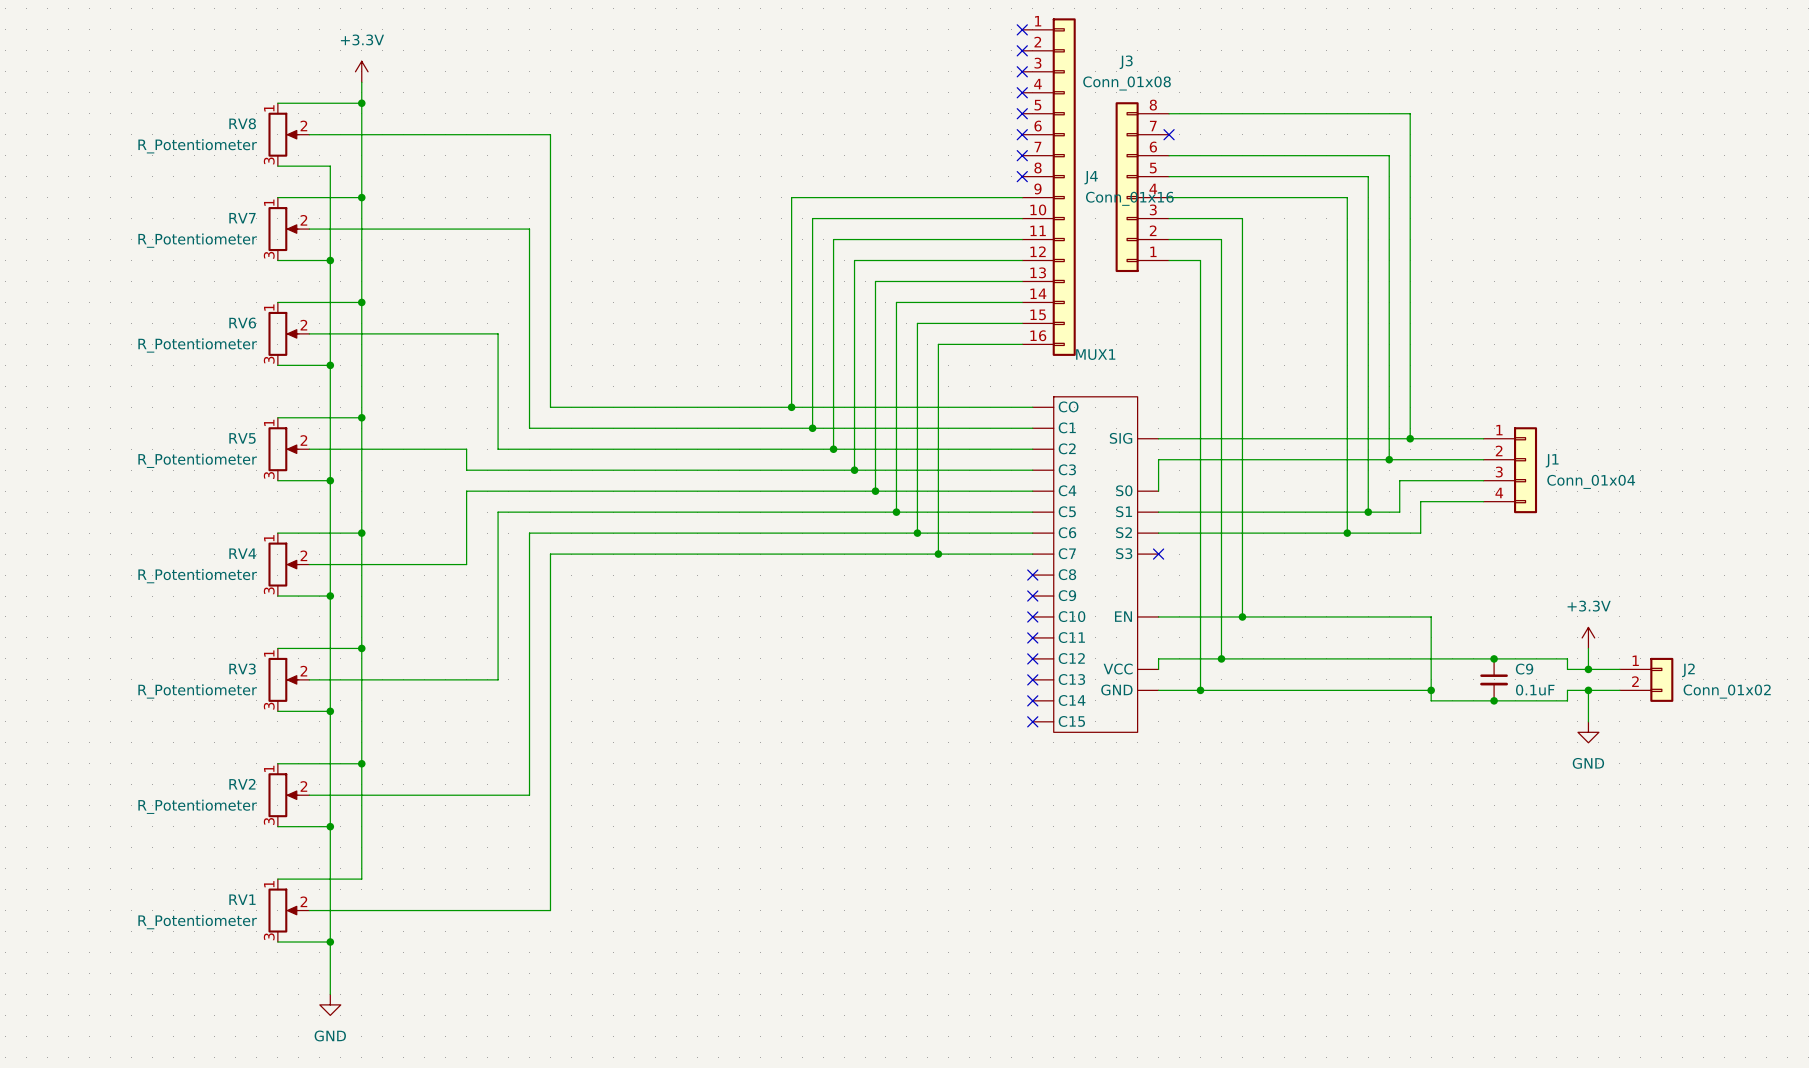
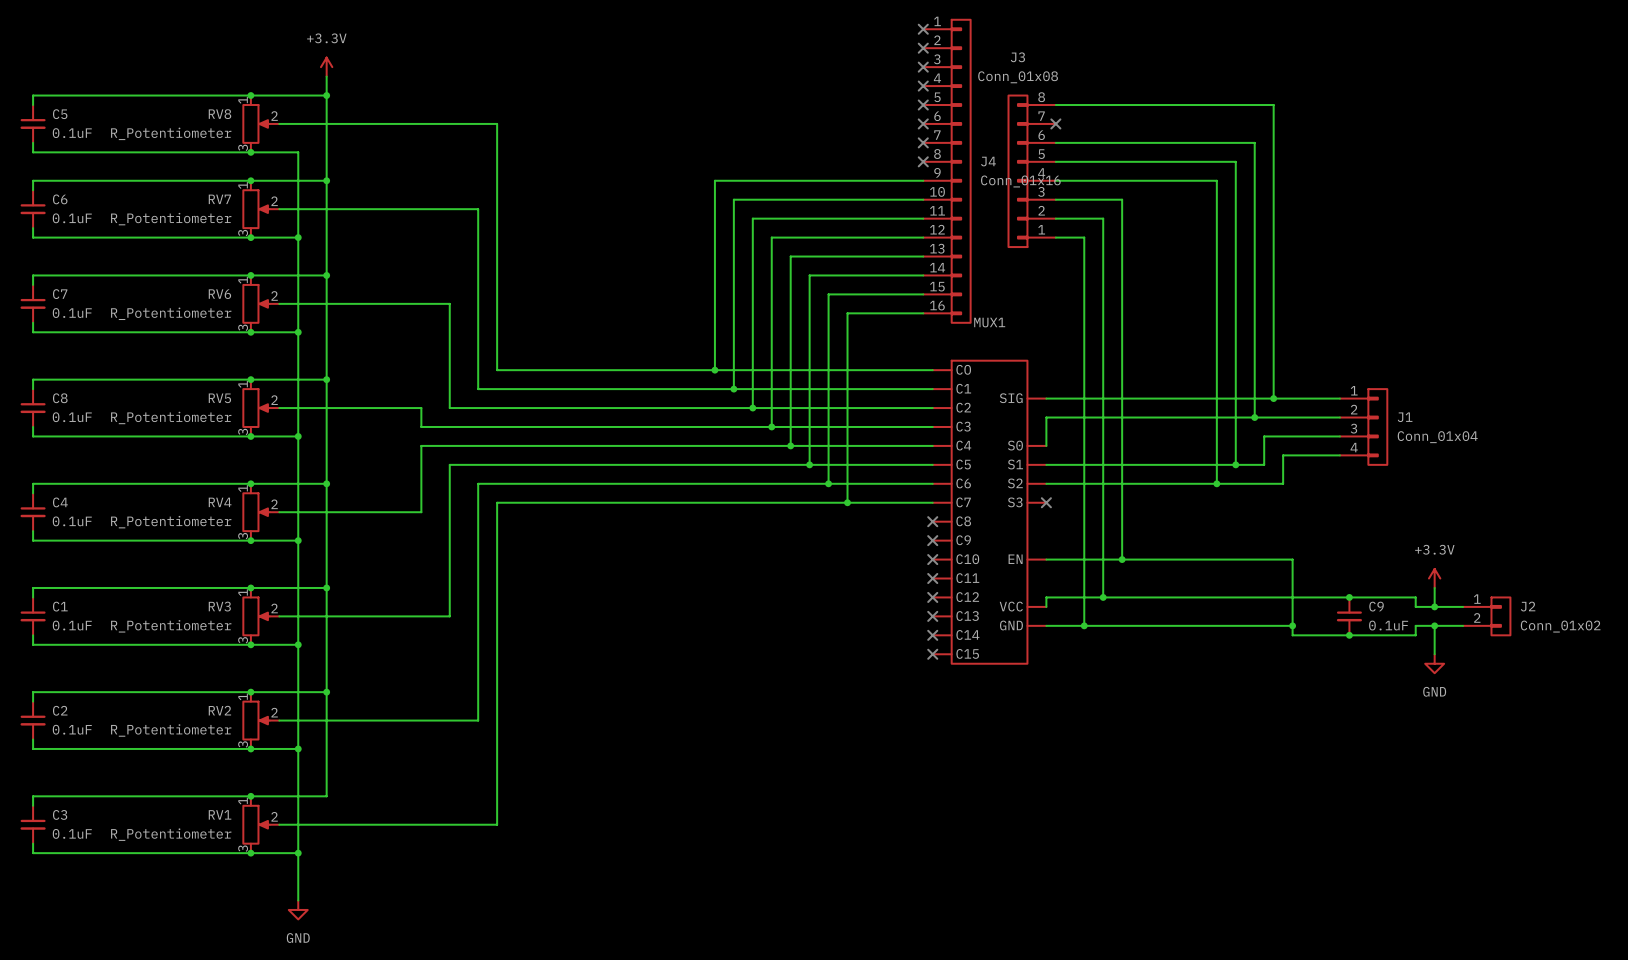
wire: none -> (250, 95) (33, 95) (33, 105)
junction: none -> (250, 95)
C5: none -> 0.1uF (33, 123)
wire: none -> (33, 142) (33, 152) (250, 152)
junction: none -> (250, 152)
wire: none -> (250, 180) (33, 180) (33, 190)
junction: none -> (250, 180)
C6: none -> 0.1uF (33, 209)
wire: none -> (33, 228) (33, 237) (250, 237)
junction: none -> (250, 237)
wire: none -> (250, 275) (33, 275) (33, 284)
junction: none -> (250, 275)
C7: none -> 0.1uF (33, 303)
wire: none -> (33, 322) (33, 332) (250, 332)
junction: none -> (250, 332)
wire: none -> (250, 379) (33, 379) (33, 389)
junction: none -> (250, 379)
C8: none -> 0.1uF (33, 408)
wire: none -> (33, 426) (33, 436) (250, 436)
junction: none -> (250, 436)
wire: none -> (250, 483) (33, 483) (33, 493)
junction: none -> (250, 483)
C4: none -> 0.1uF (33, 512)
wire: none -> (33, 531) (33, 540) (250, 540)
junction: none -> (250, 540)
wire: none -> (250, 587) (33, 587) (33, 597)
junction: none -> (250, 587)
C1: none -> 0.1uF (33, 616)
wire: none -> (33, 635) (33, 644) (250, 644)
junction: none -> (250, 644)
wire: none -> (250, 692) (33, 692) (33, 701)
junction: none -> (250, 692)
C2: none -> 0.1uF (33, 720)
wire: none -> (33, 739) (33, 748) (250, 748)
junction: none -> (250, 748)
wire: none -> (250, 796) (33, 796) (33, 805)
junction: none -> (250, 796)
C3: none -> 0.1uF (33, 824)
wire: none -> (33, 843) (33, 853) (250, 853)
junction: none -> (250, 853)

